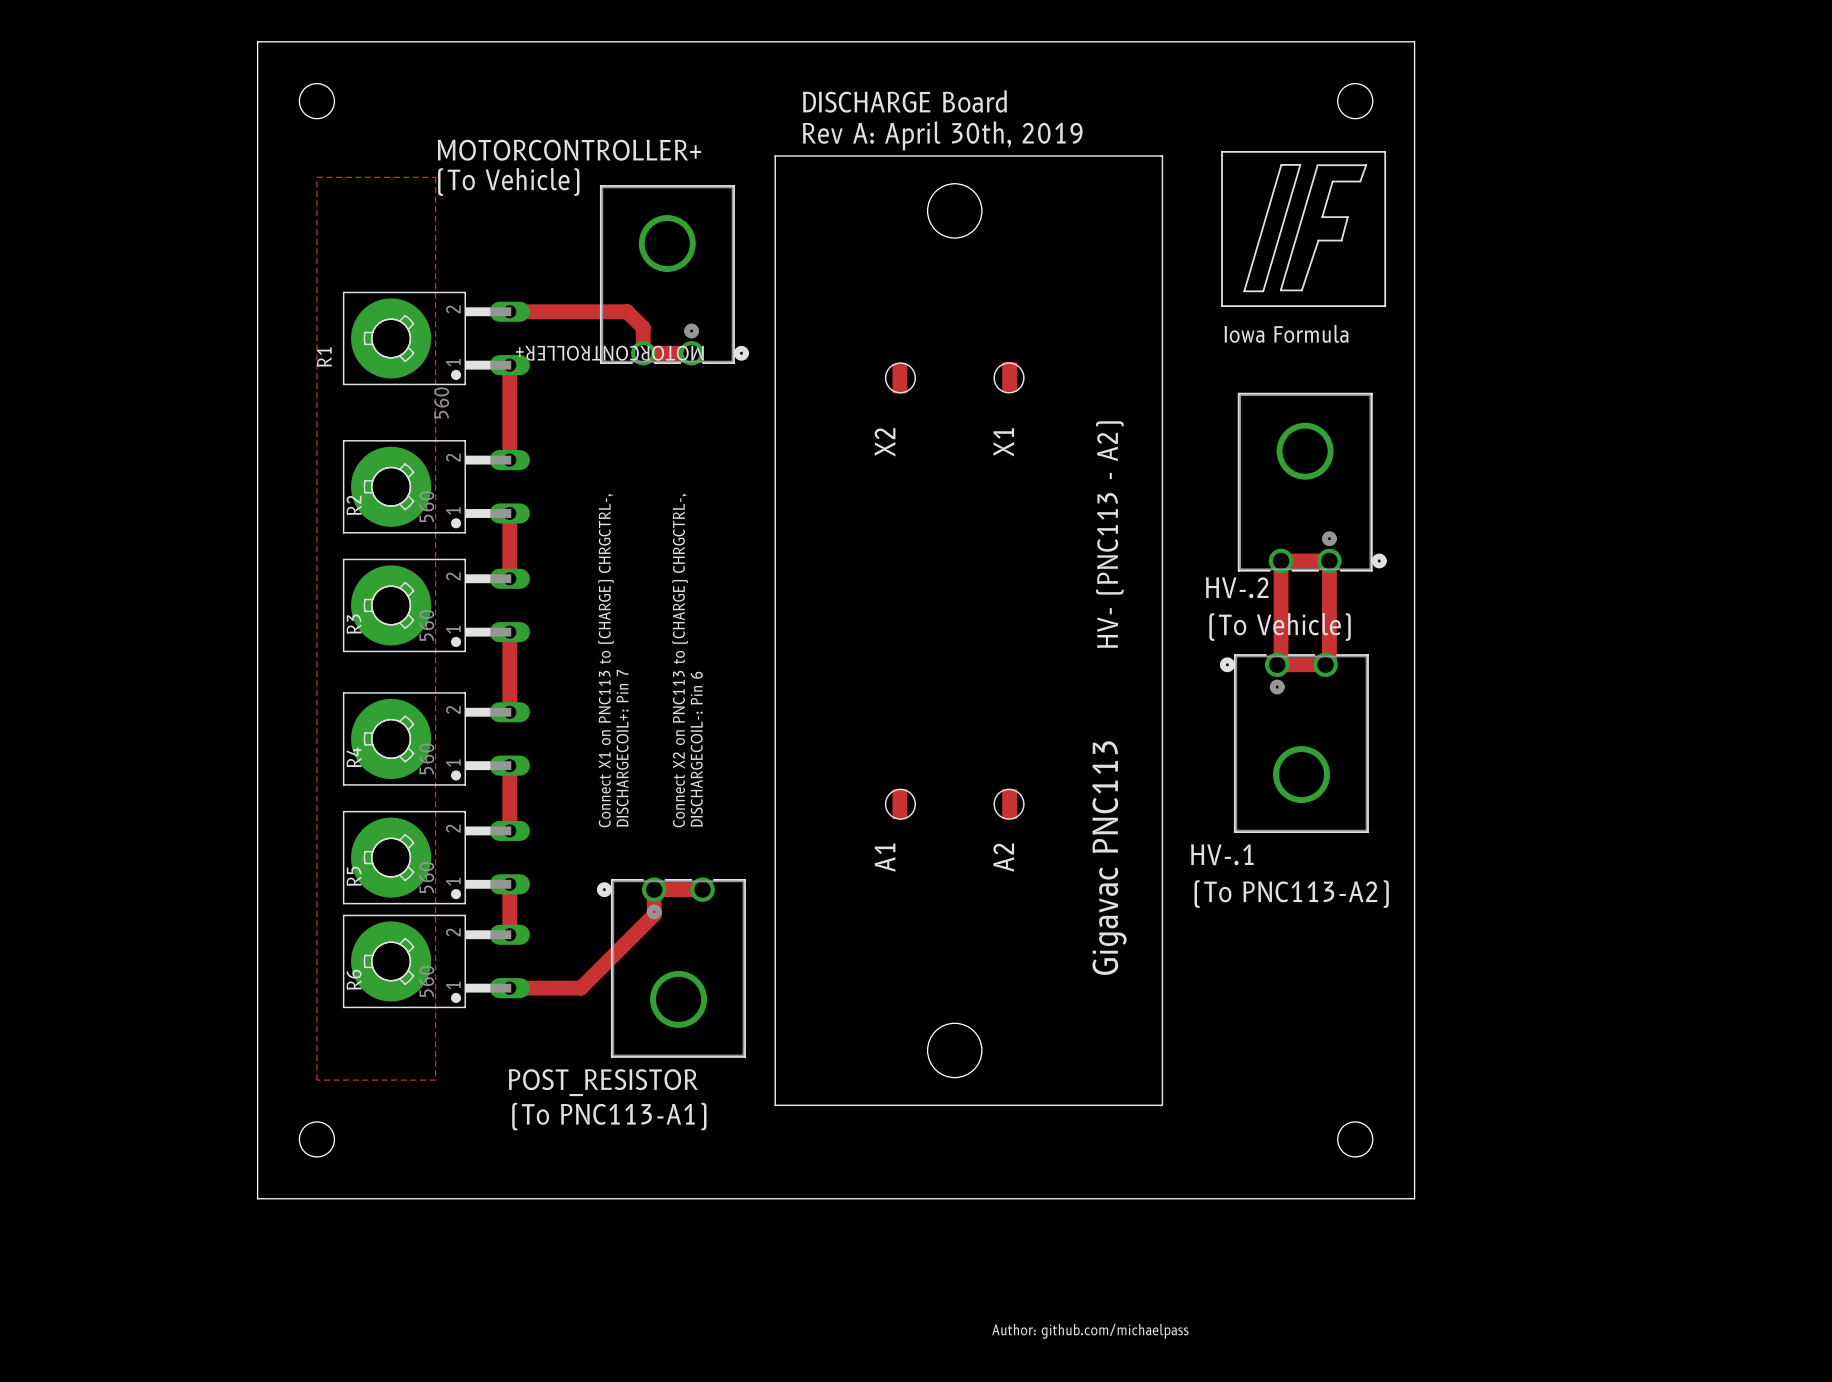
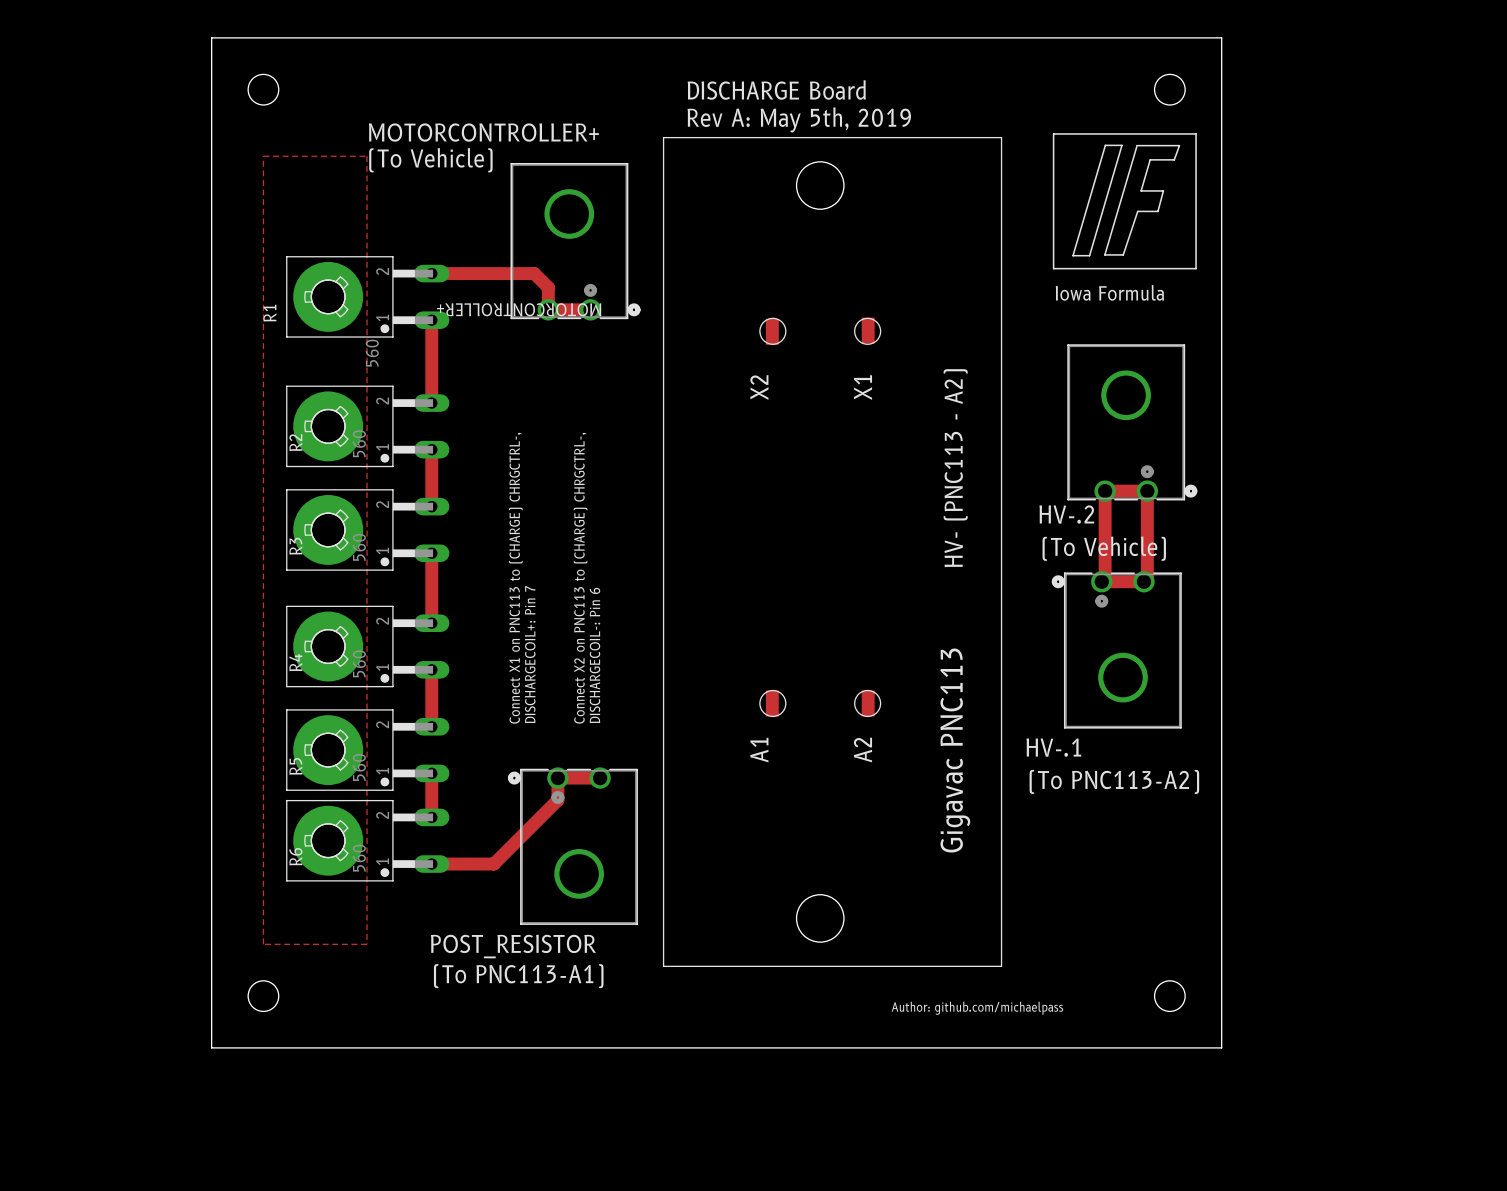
text: Rev A: April 30th, 2019 (942, 135) -> Rev A: May 5th, 2019 (799, 119)
text position: Author: github.com/michaelpass (1090, 1331) -> Author: github.com/michaelpass (977, 1008)

